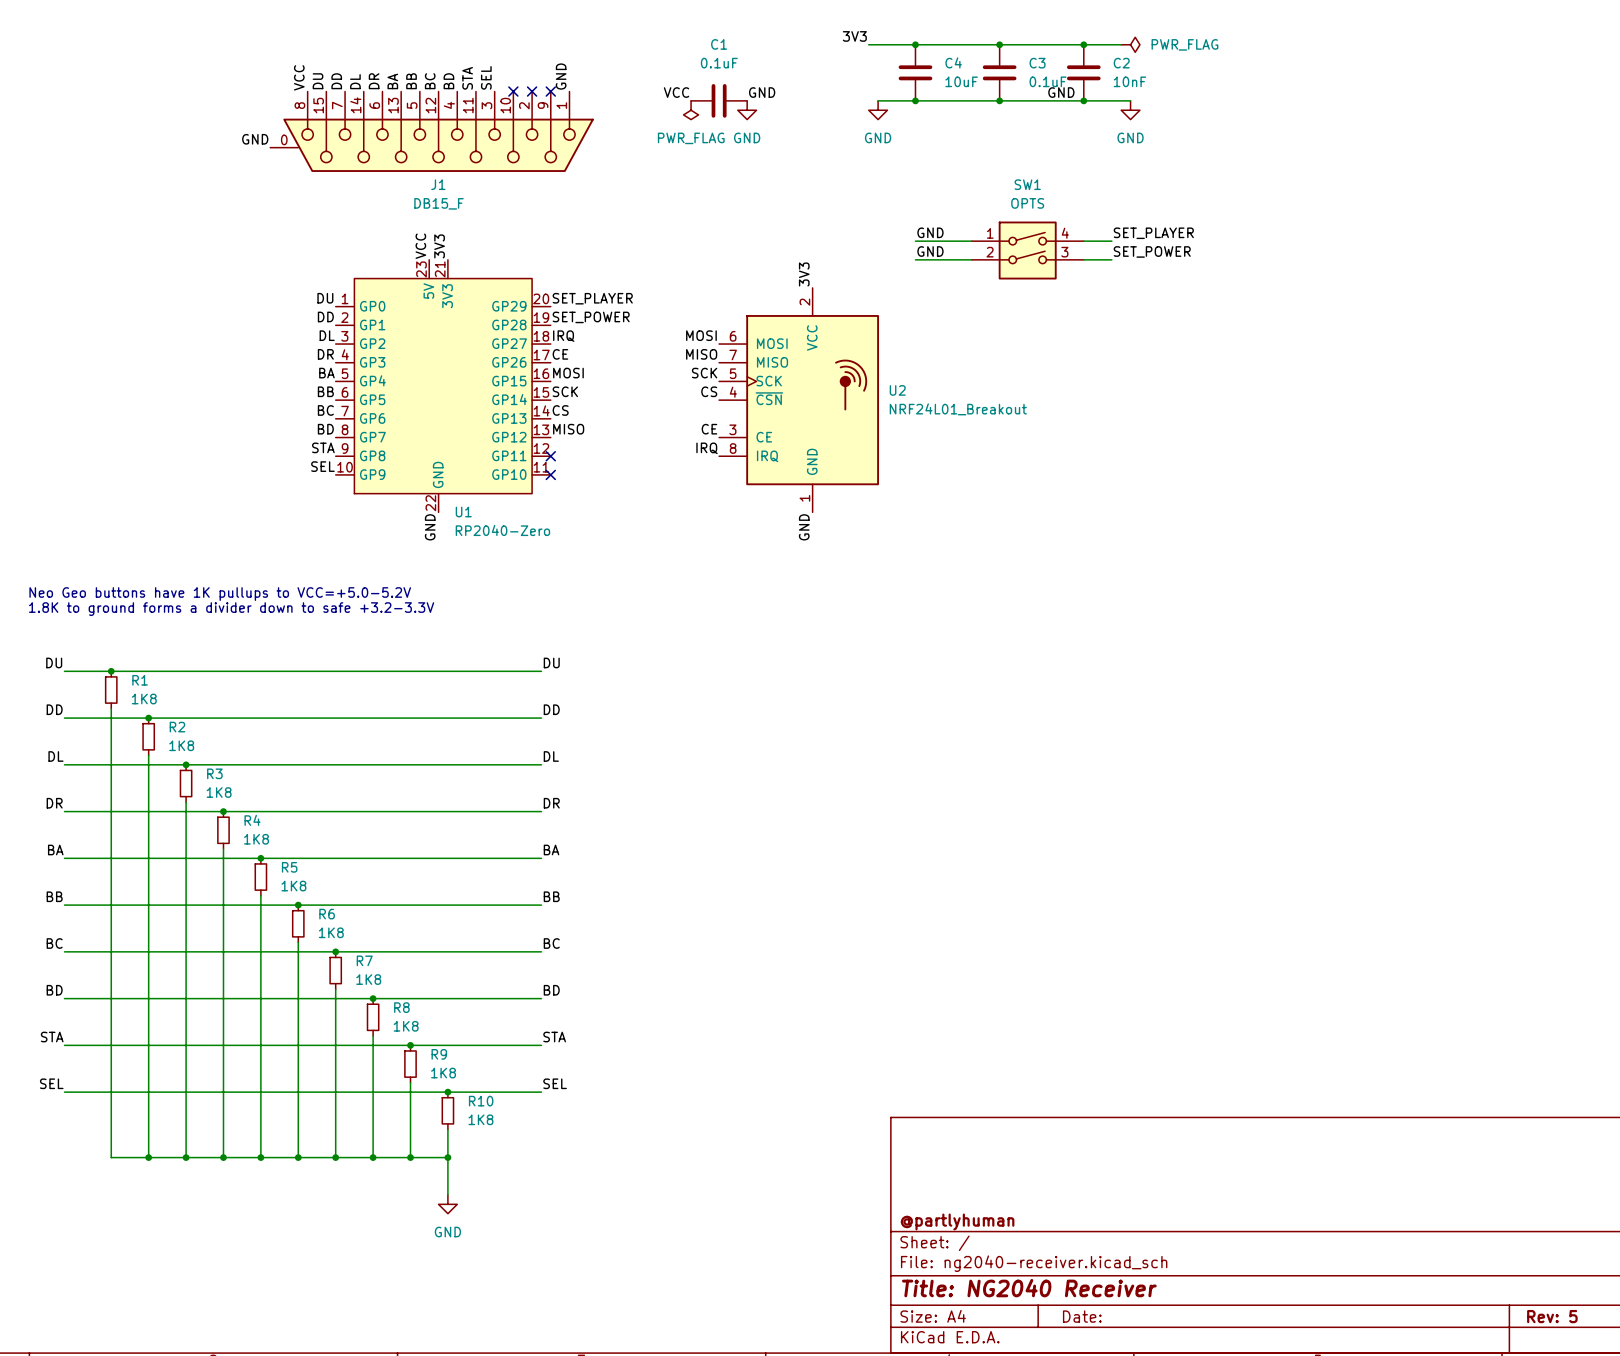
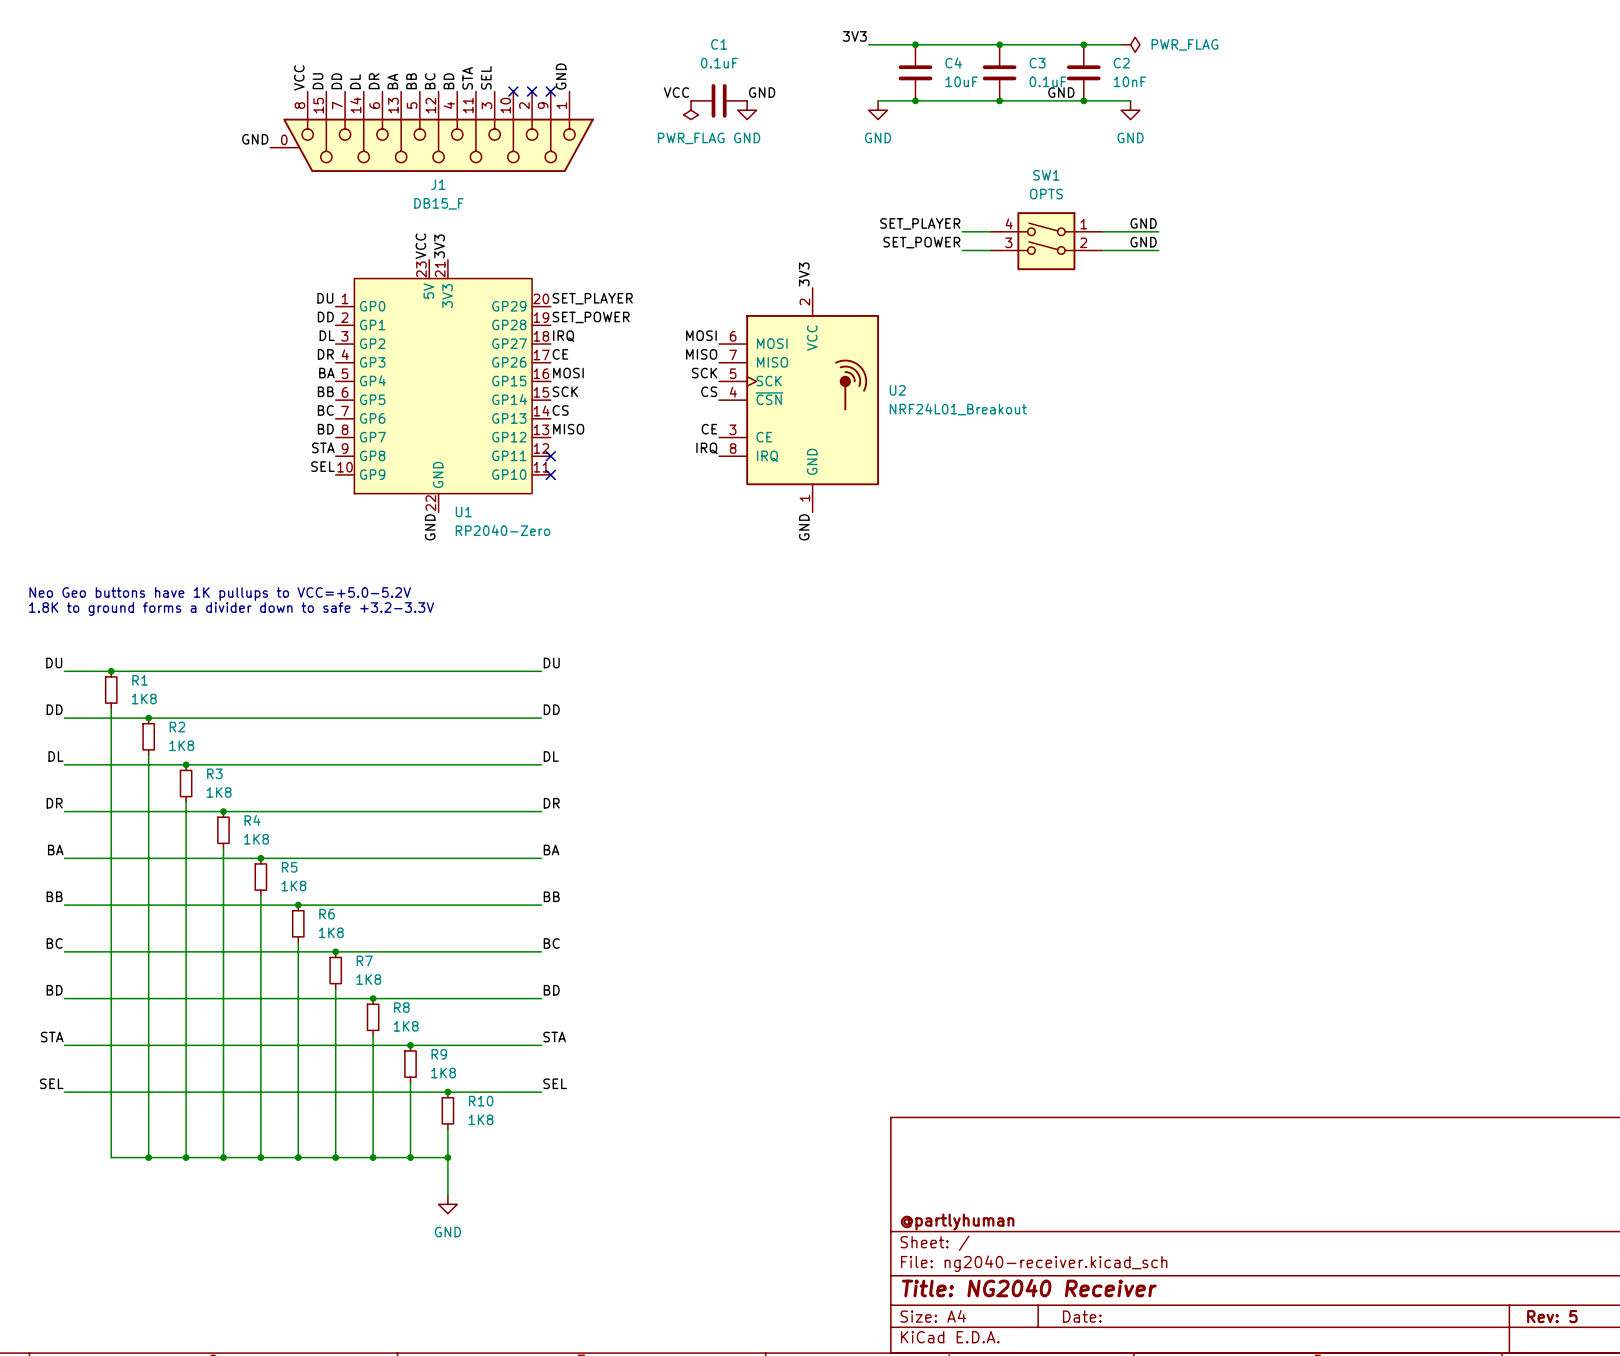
label: none -> GND (1143, 223)
wire: none -> (1102, 231) (1158, 231)
label: GND (930, 232) -> none
label position: SET_PLAYER (1153, 233) -> SET_PLAYER (920, 223)
wire: (915, 241) (971, 241) -> none
wire: (1083, 241) (1111, 241) -> (962, 231) (990, 231)
label: none -> GND (1143, 242)
SW1 flip: as is (1027, 250) -> left-right (1046, 241)
wire: none -> (1102, 250) (1158, 250)
label: GND (930, 251) -> none
label position: SET_POWER (1152, 251) -> SET_POWER (921, 242)
wire: (915, 259) (971, 259) -> none
wire: (1083, 259) (1111, 259) -> (962, 250) (990, 250)

